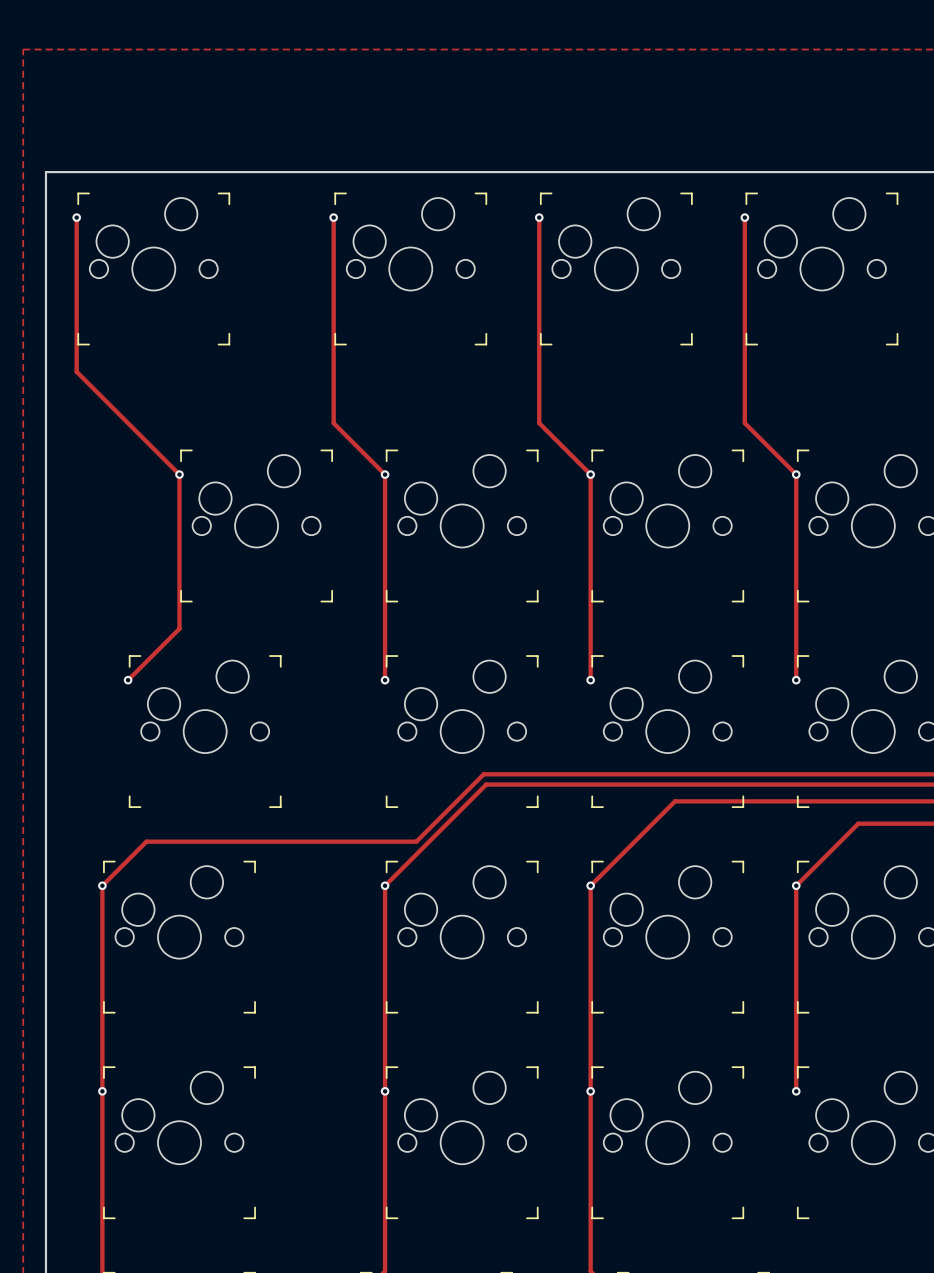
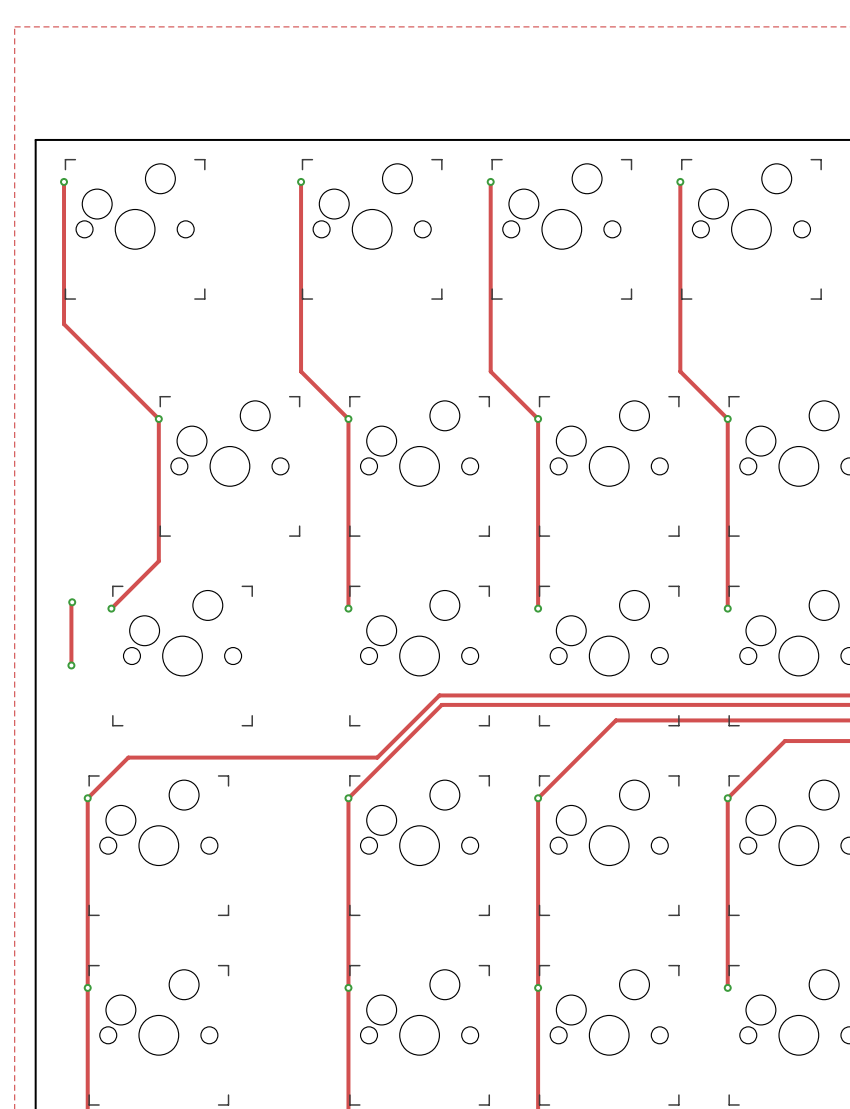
track: none -> (72, 602) (71, 665)
via: none -> (72, 602)
via: none -> (71, 665)

